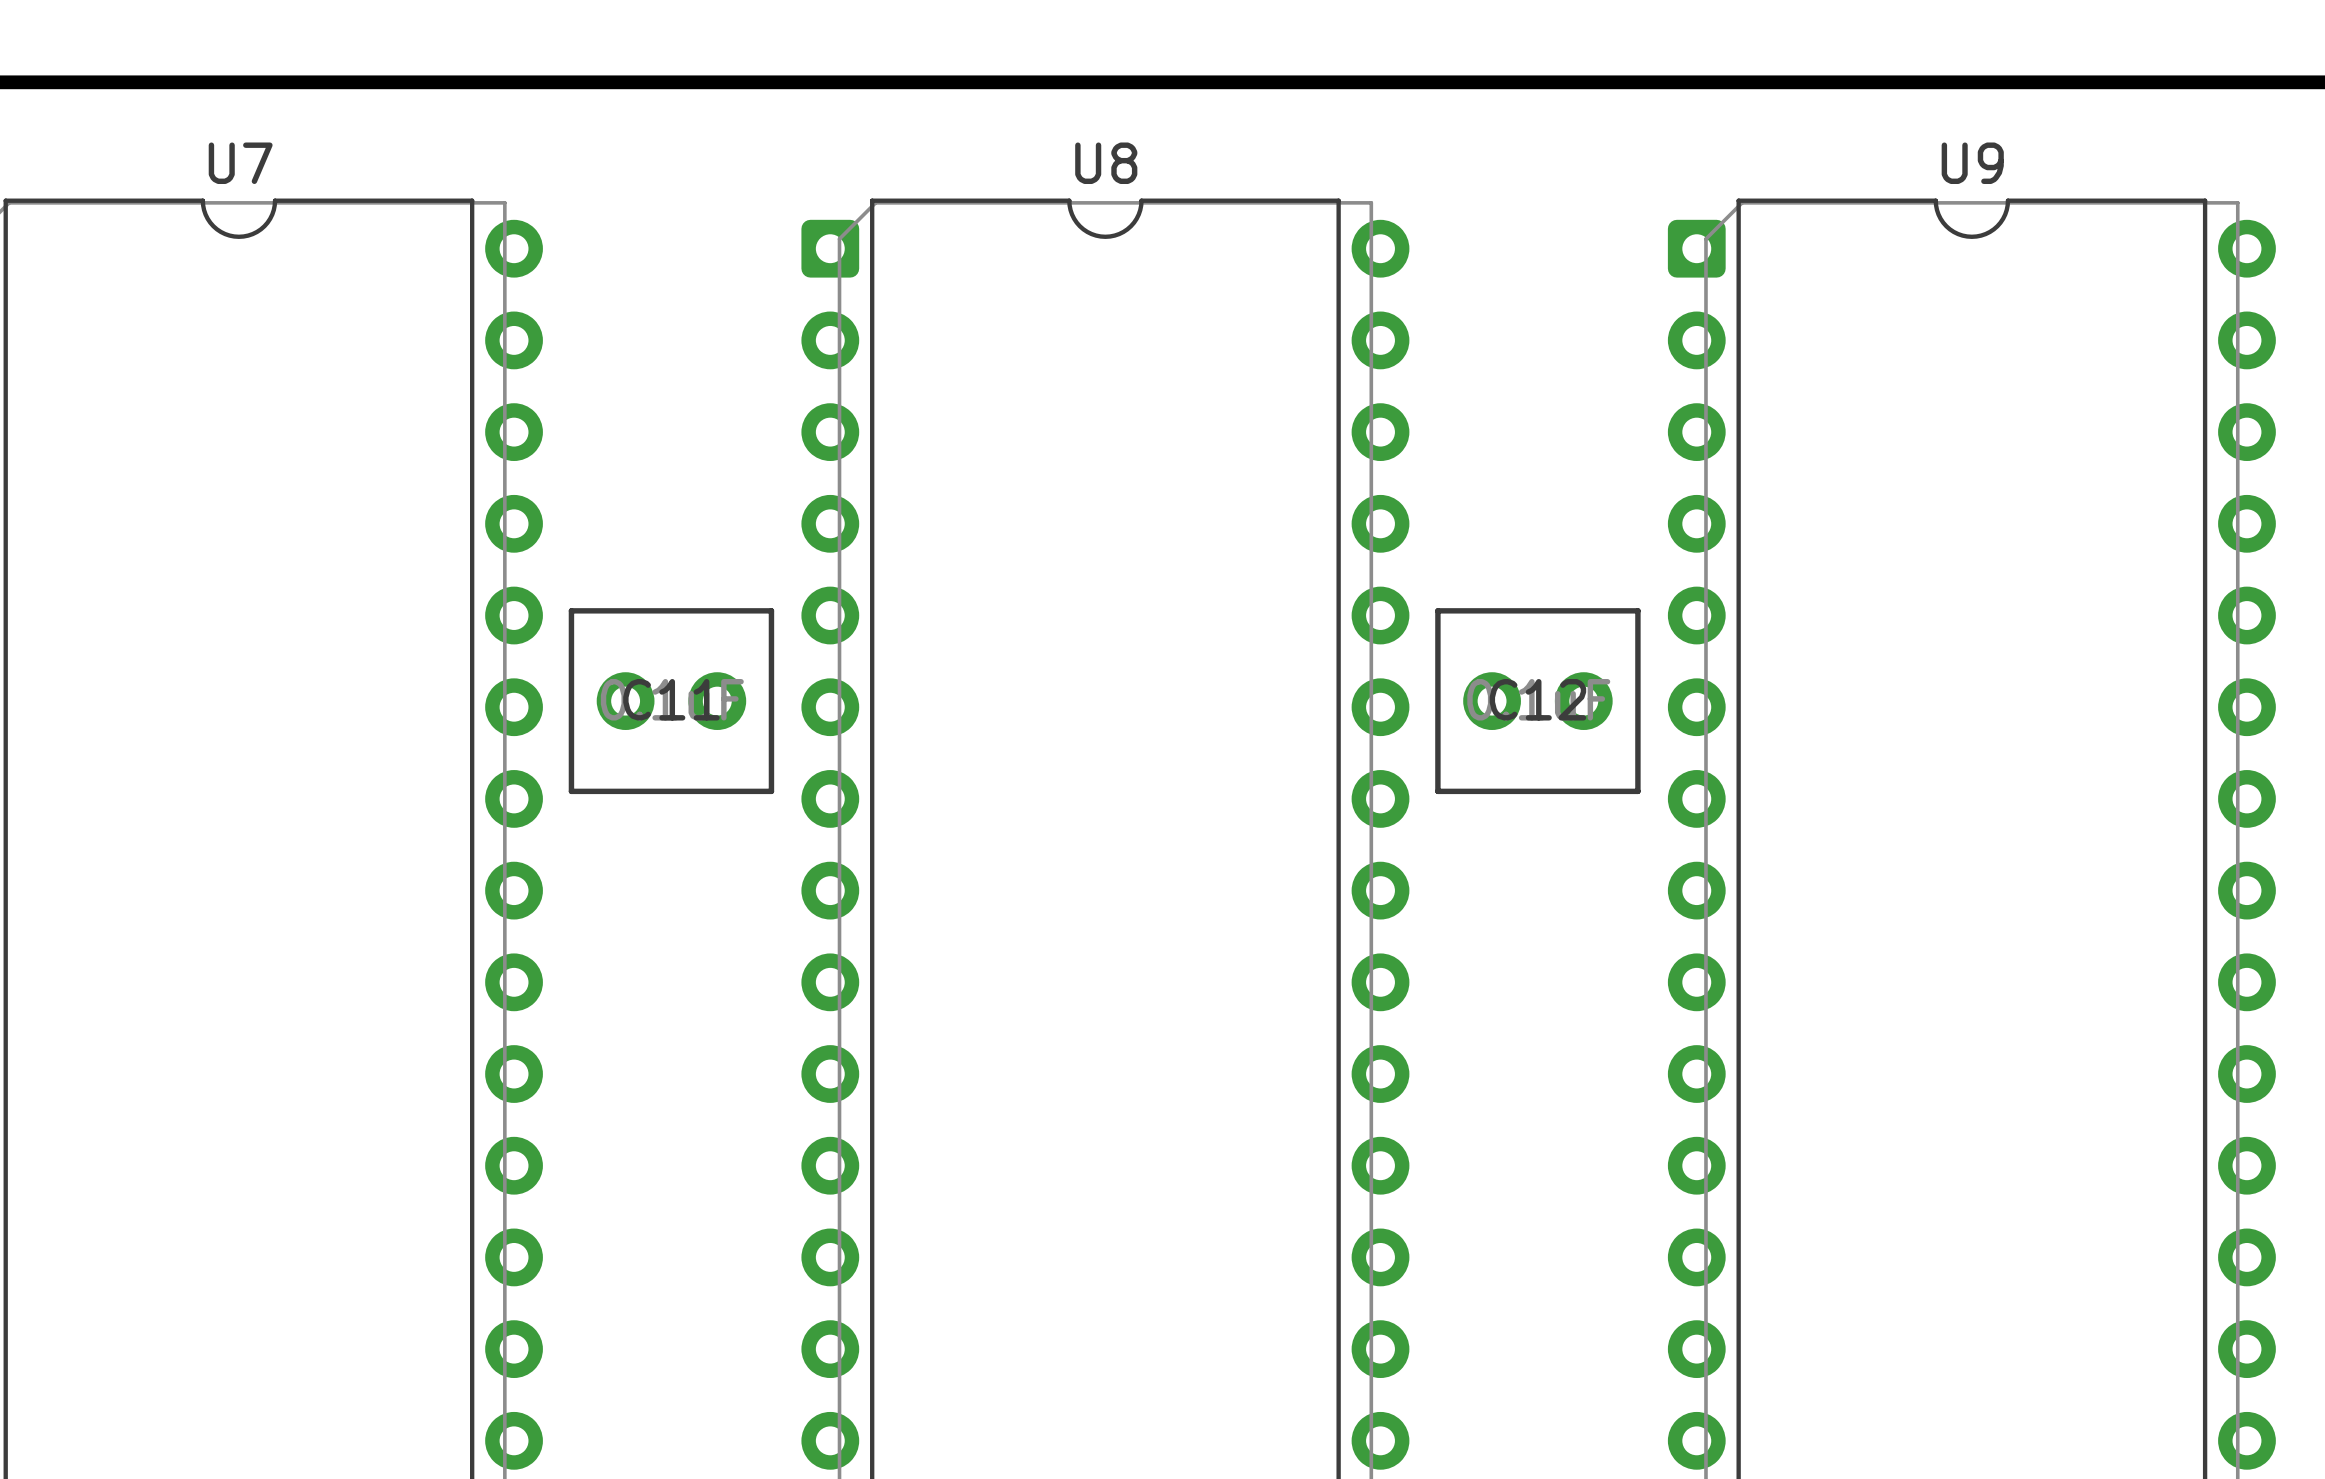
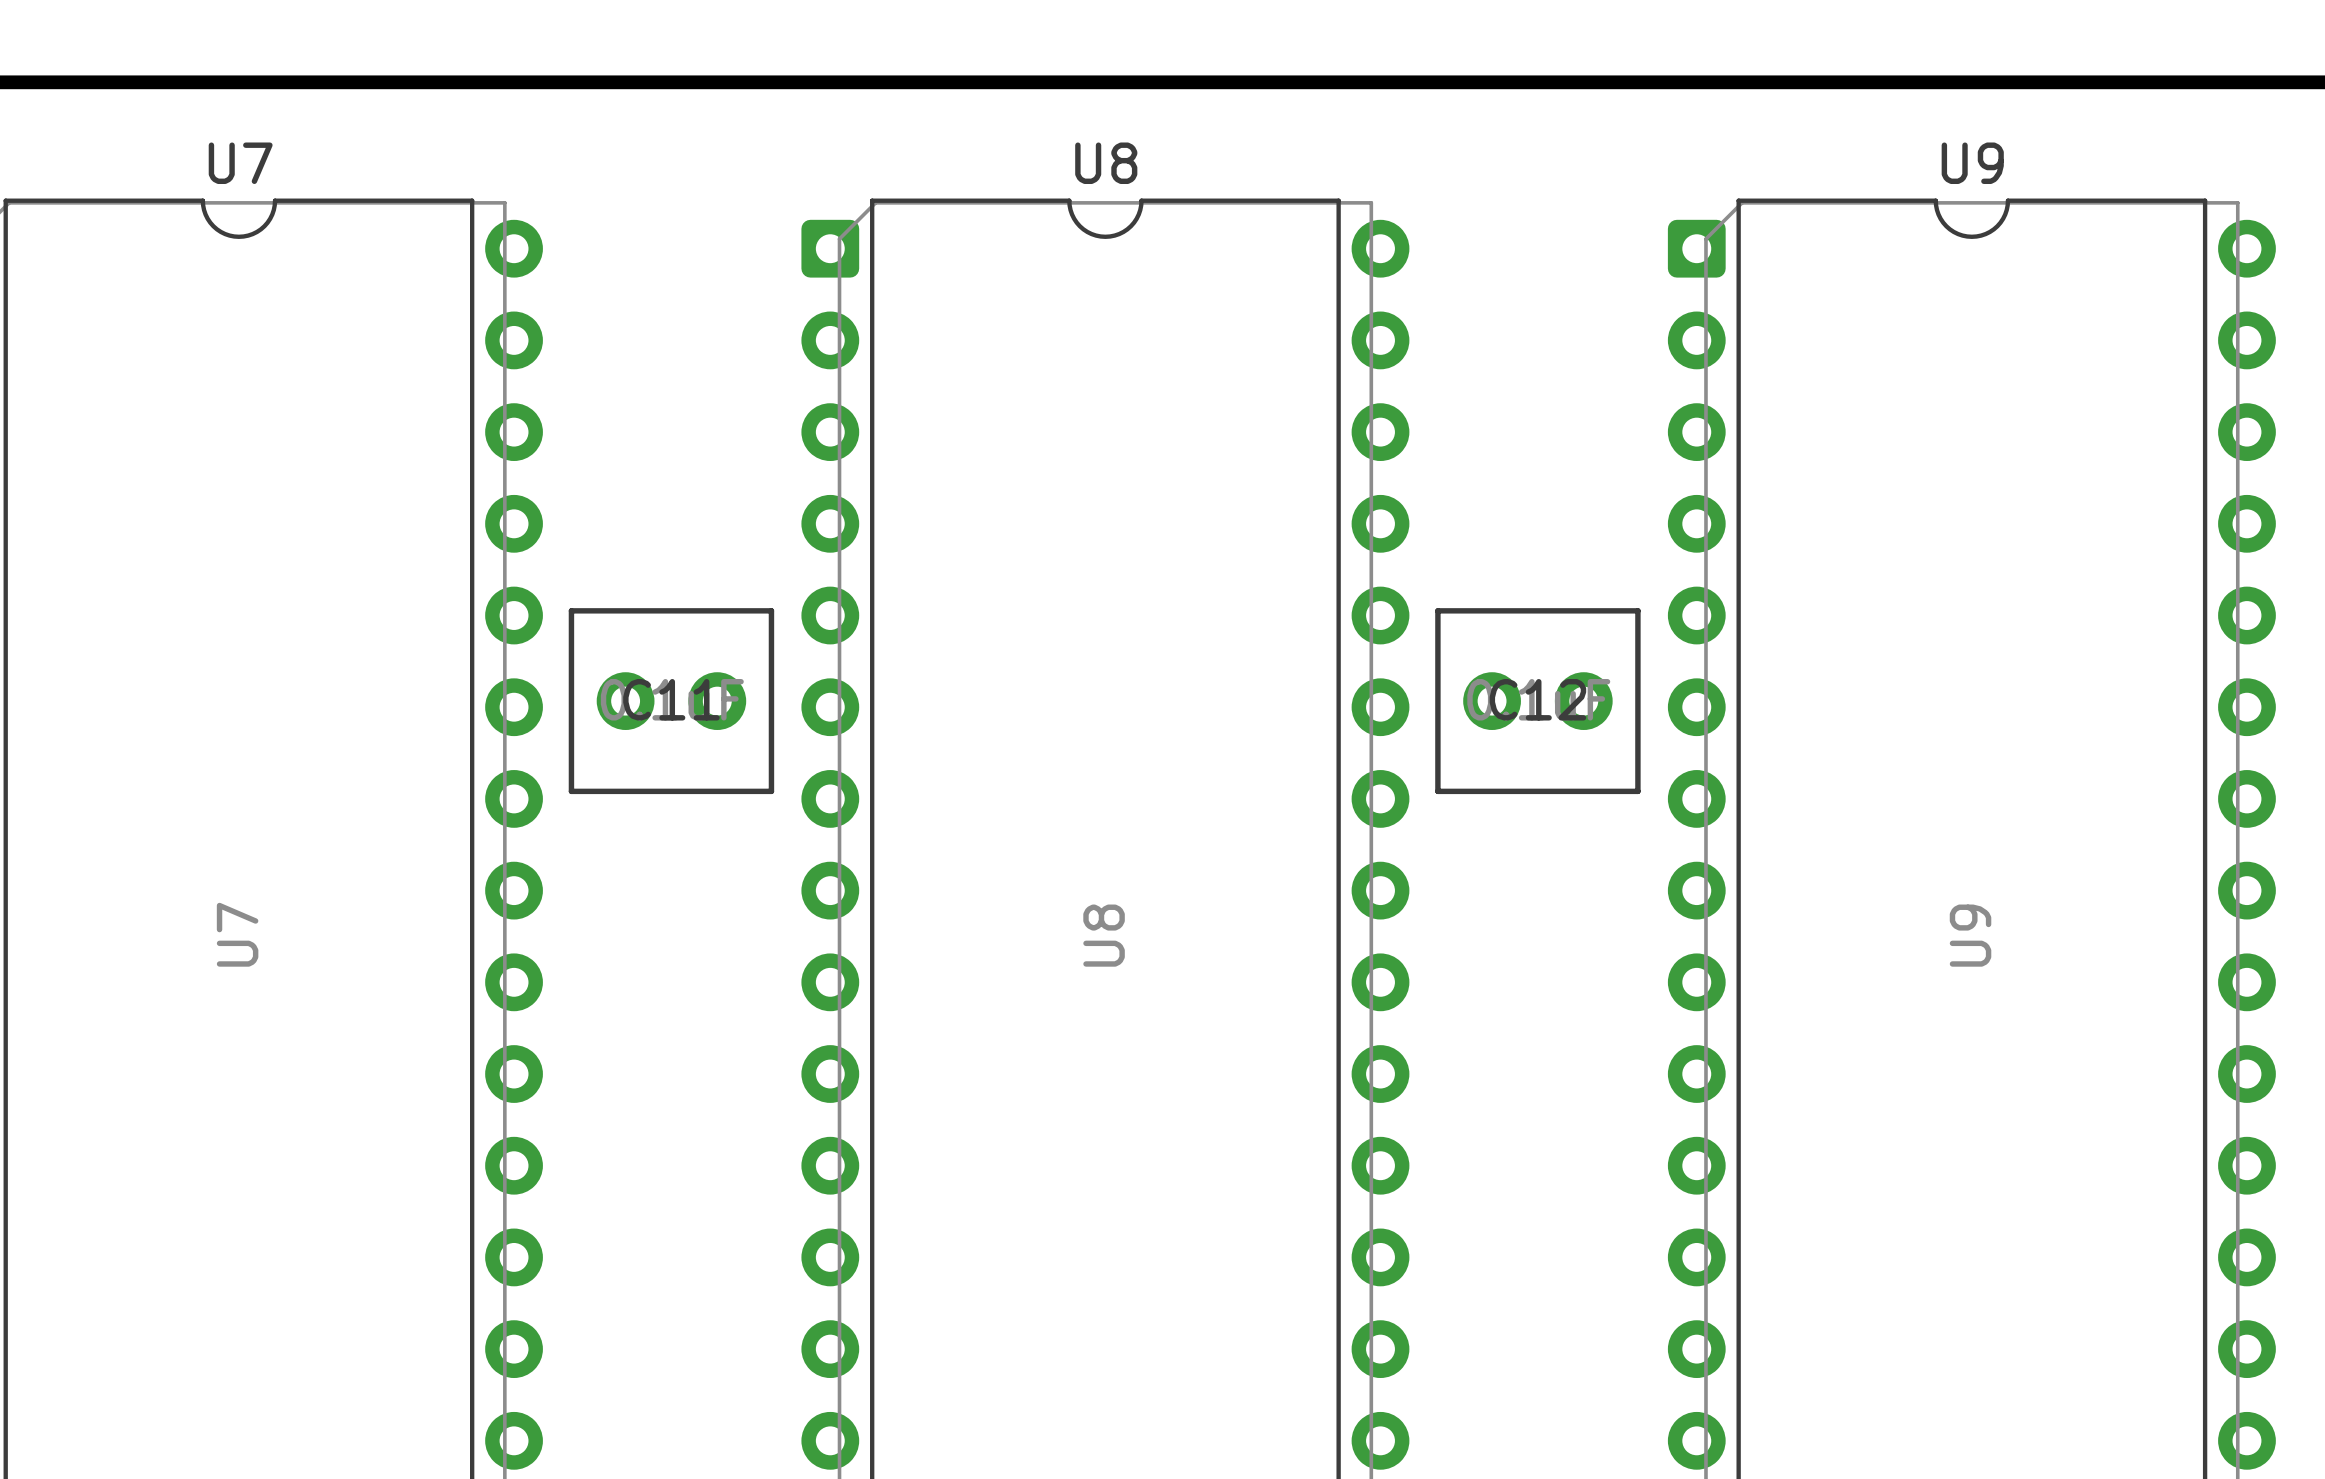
U7 text: none -> U7 (237, 934)
U8 text: none -> U8 (1104, 935)
U9 text: none -> U9 (1970, 935)

